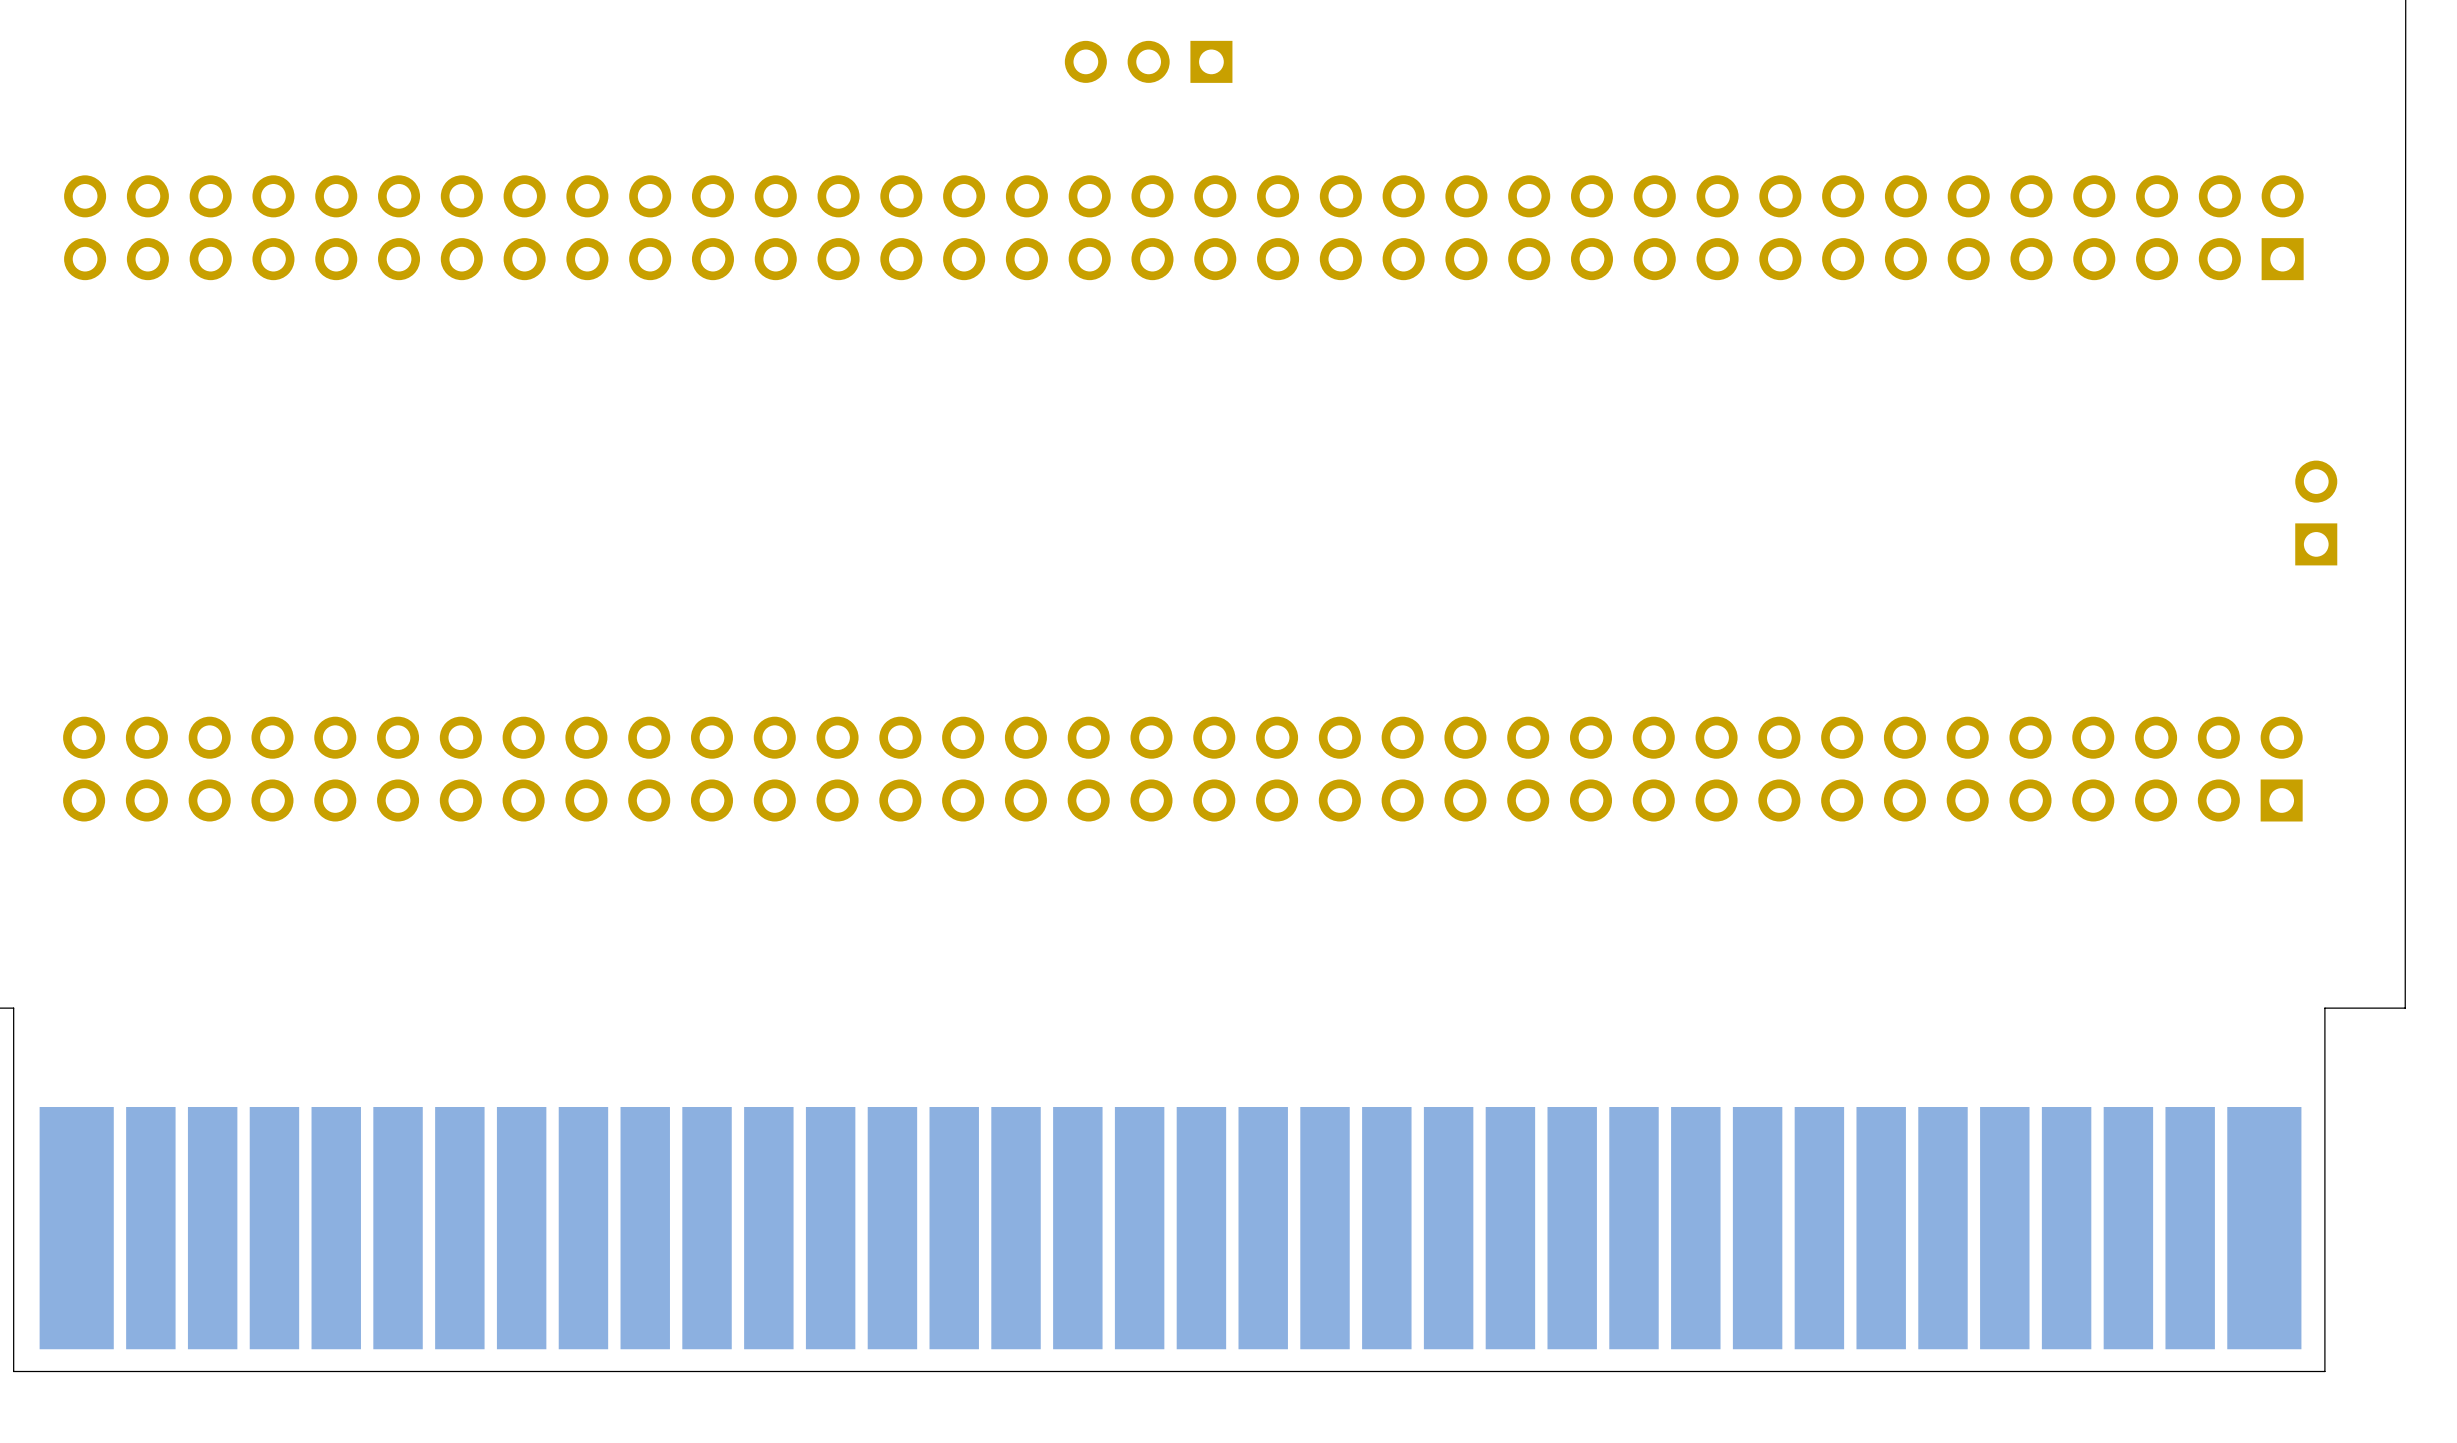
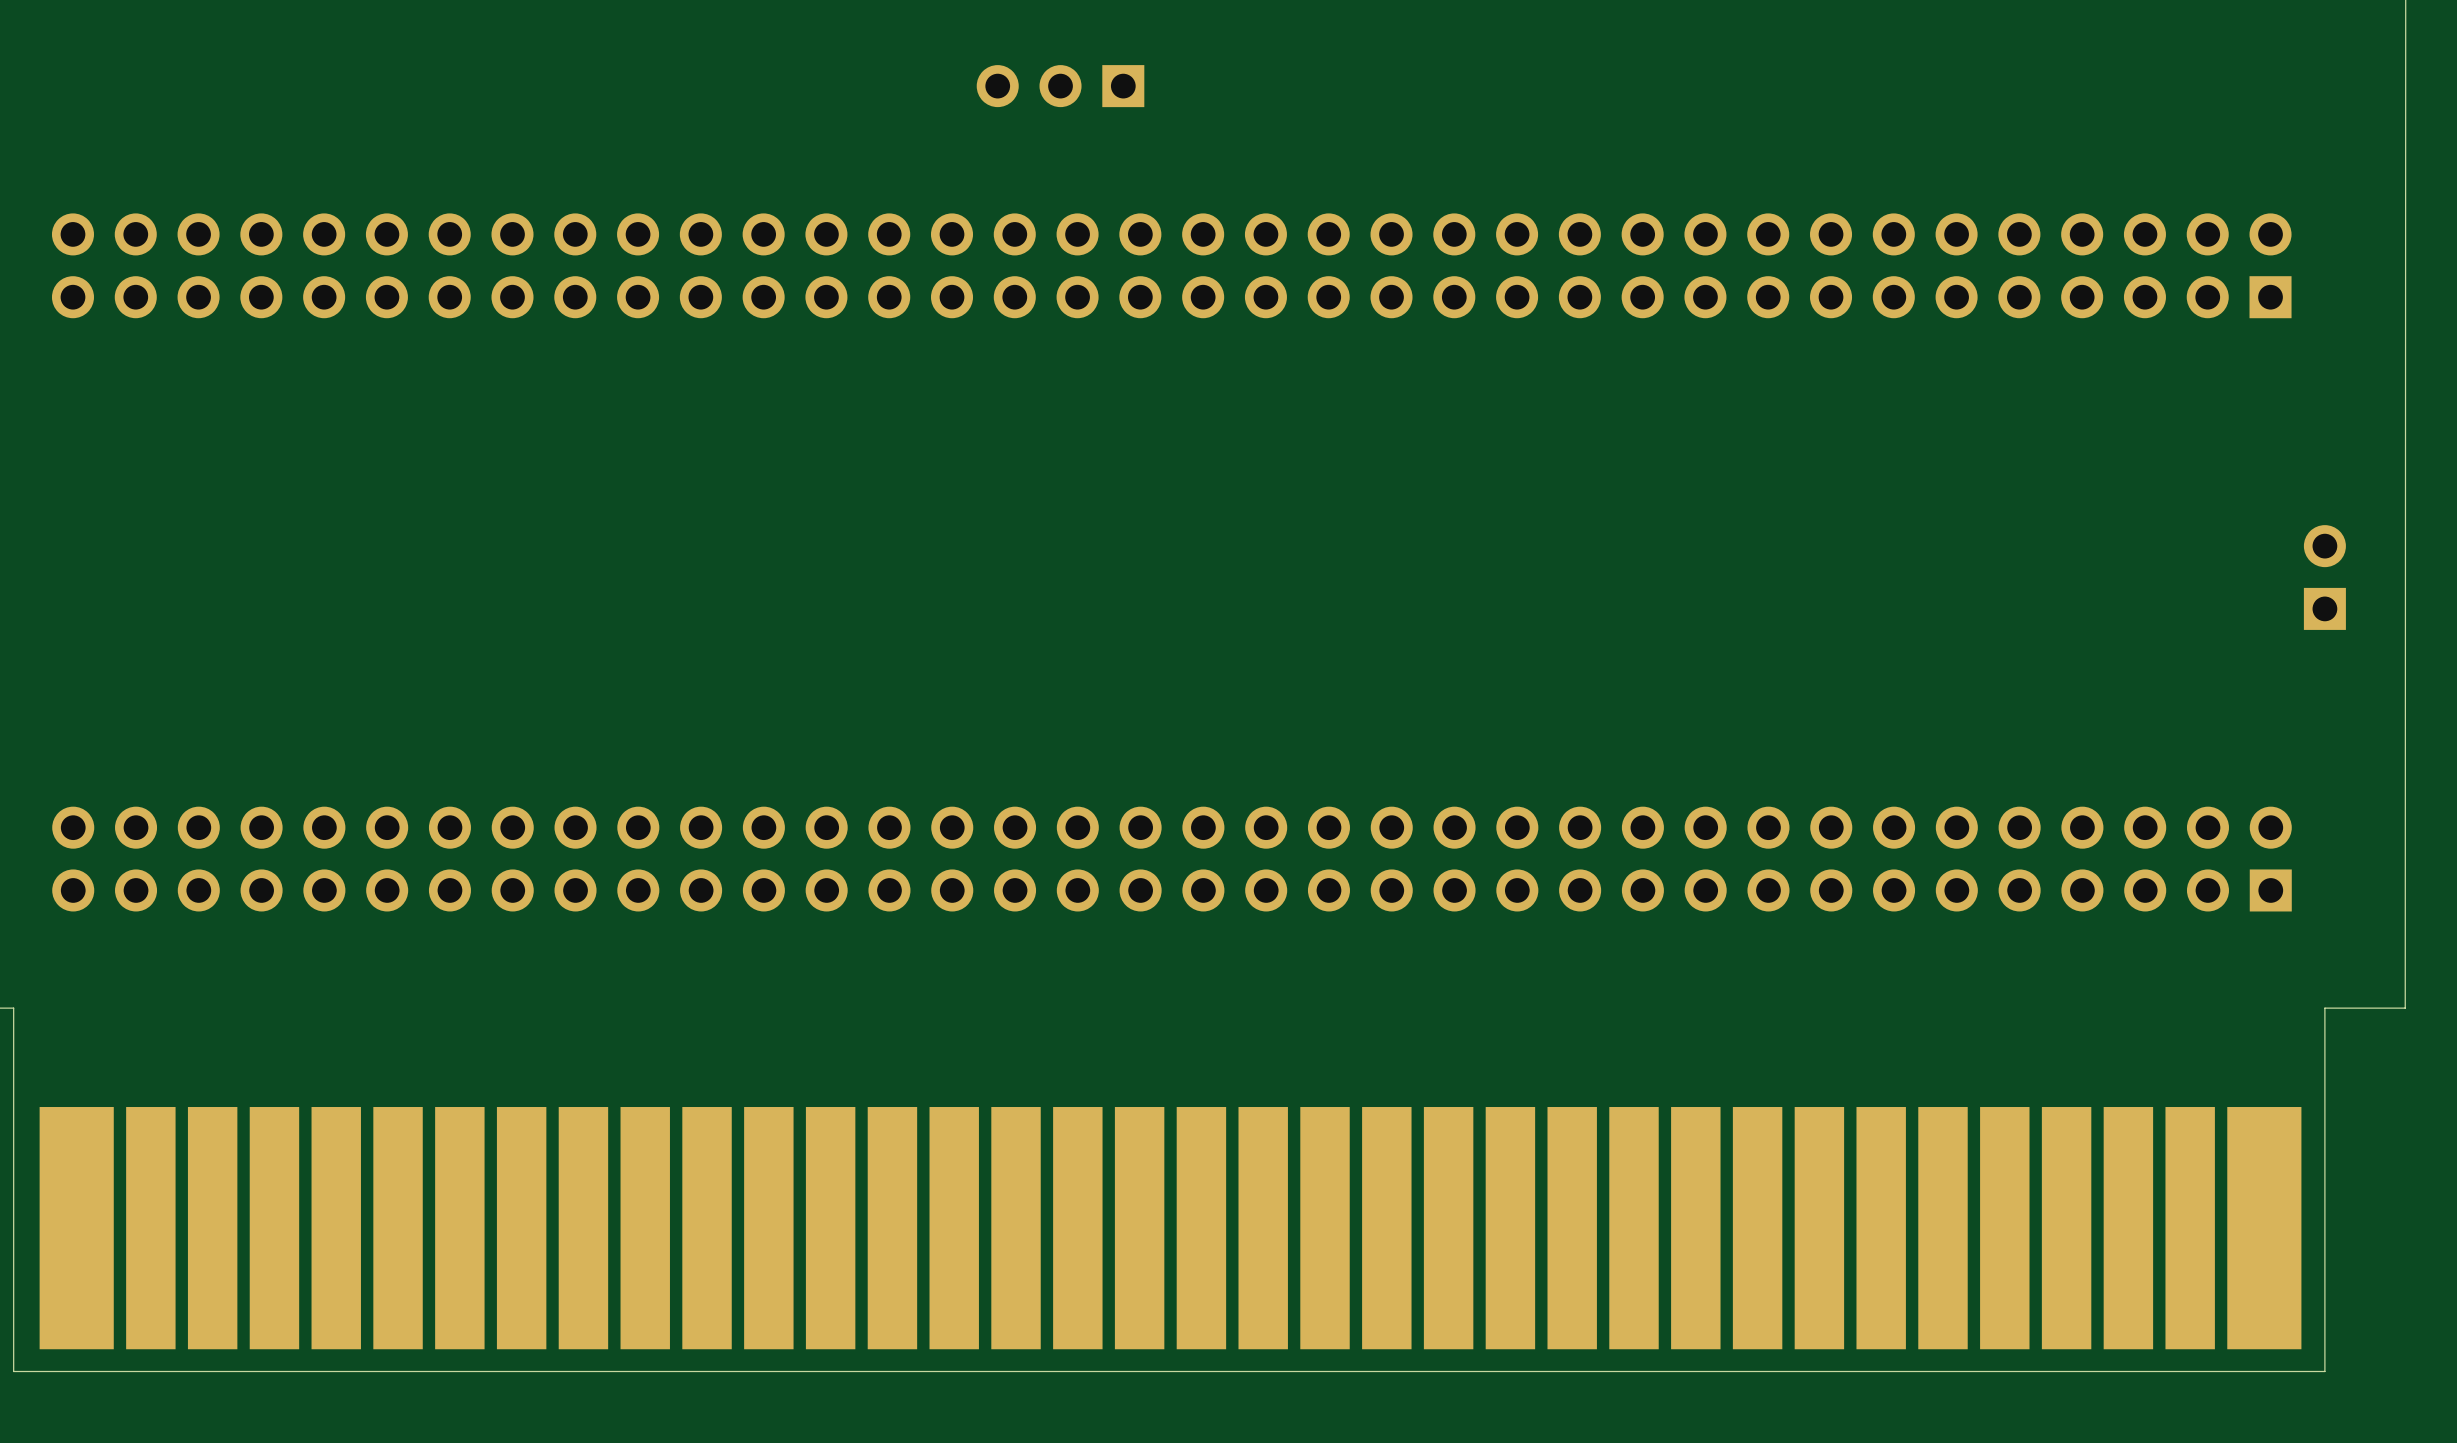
part position: (1148, 61) -> (1060, 86)
part position: (1183, 227) -> (1171, 265)
part position: (2316, 513) -> (2324, 577)
part position: (1182, 769) -> (1172, 859)

